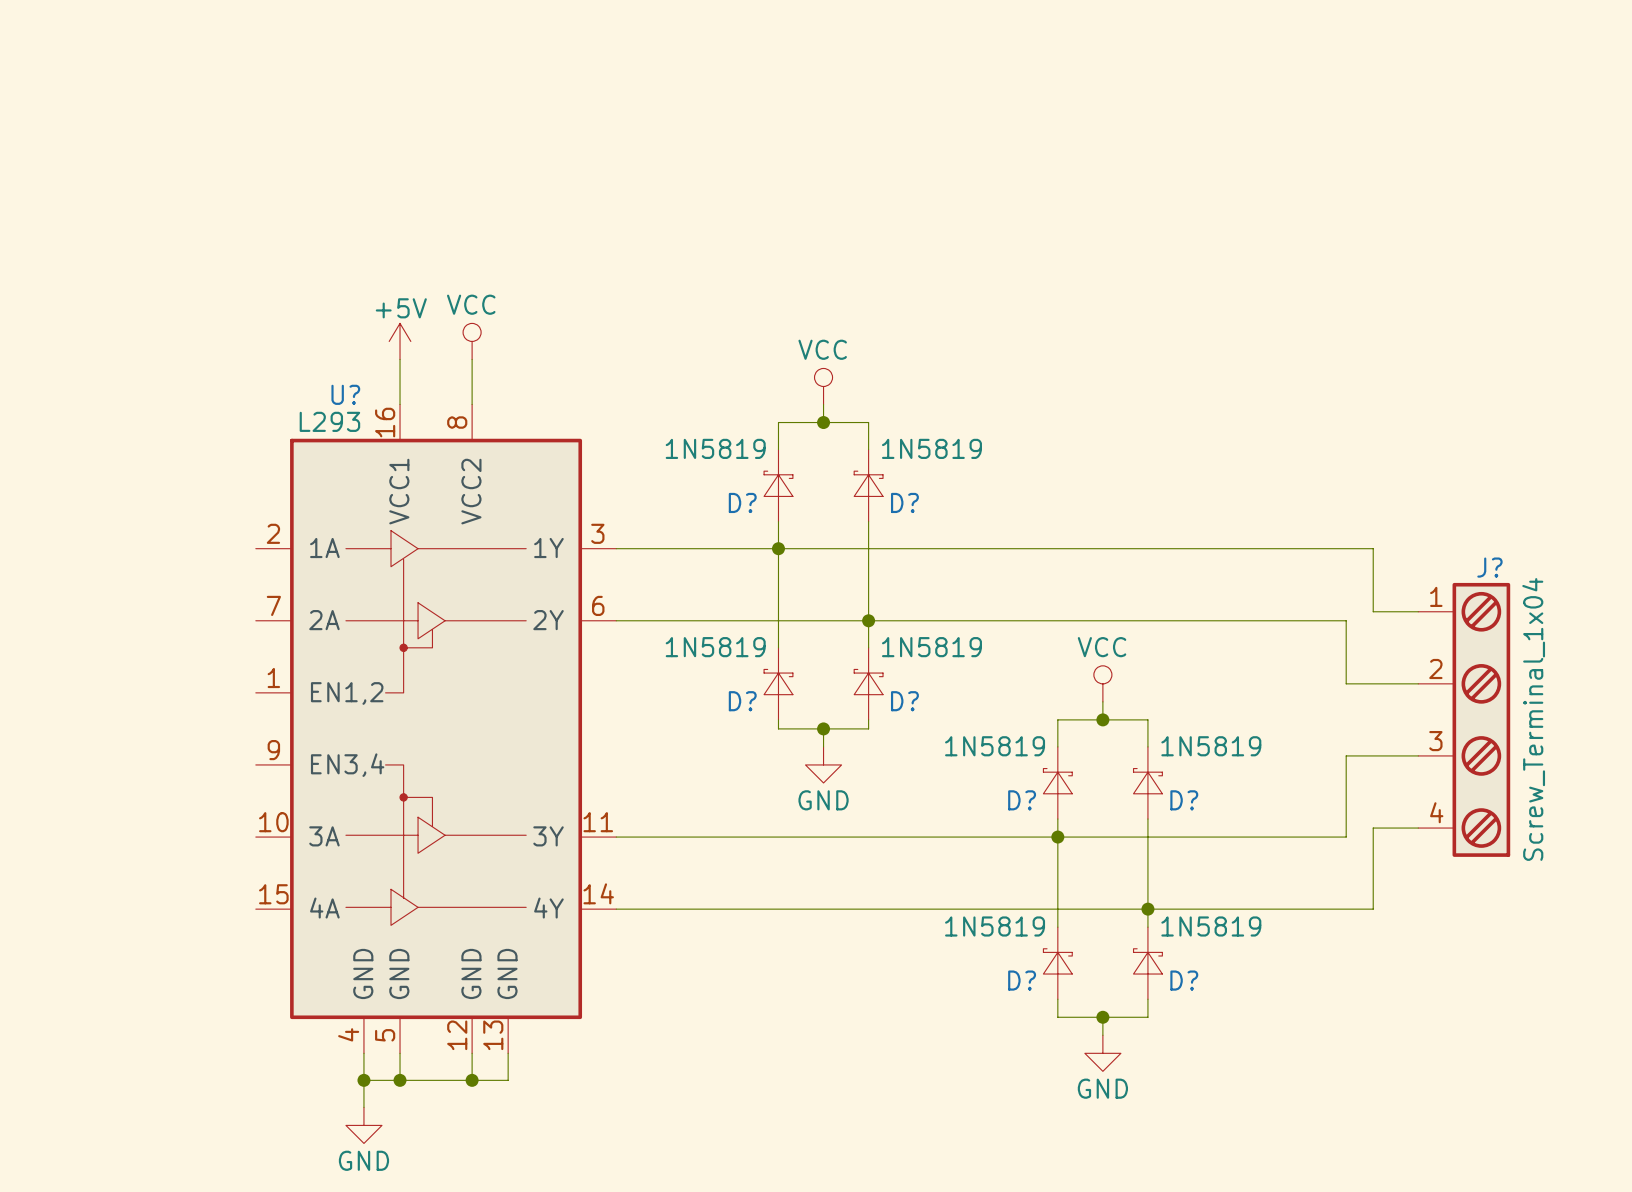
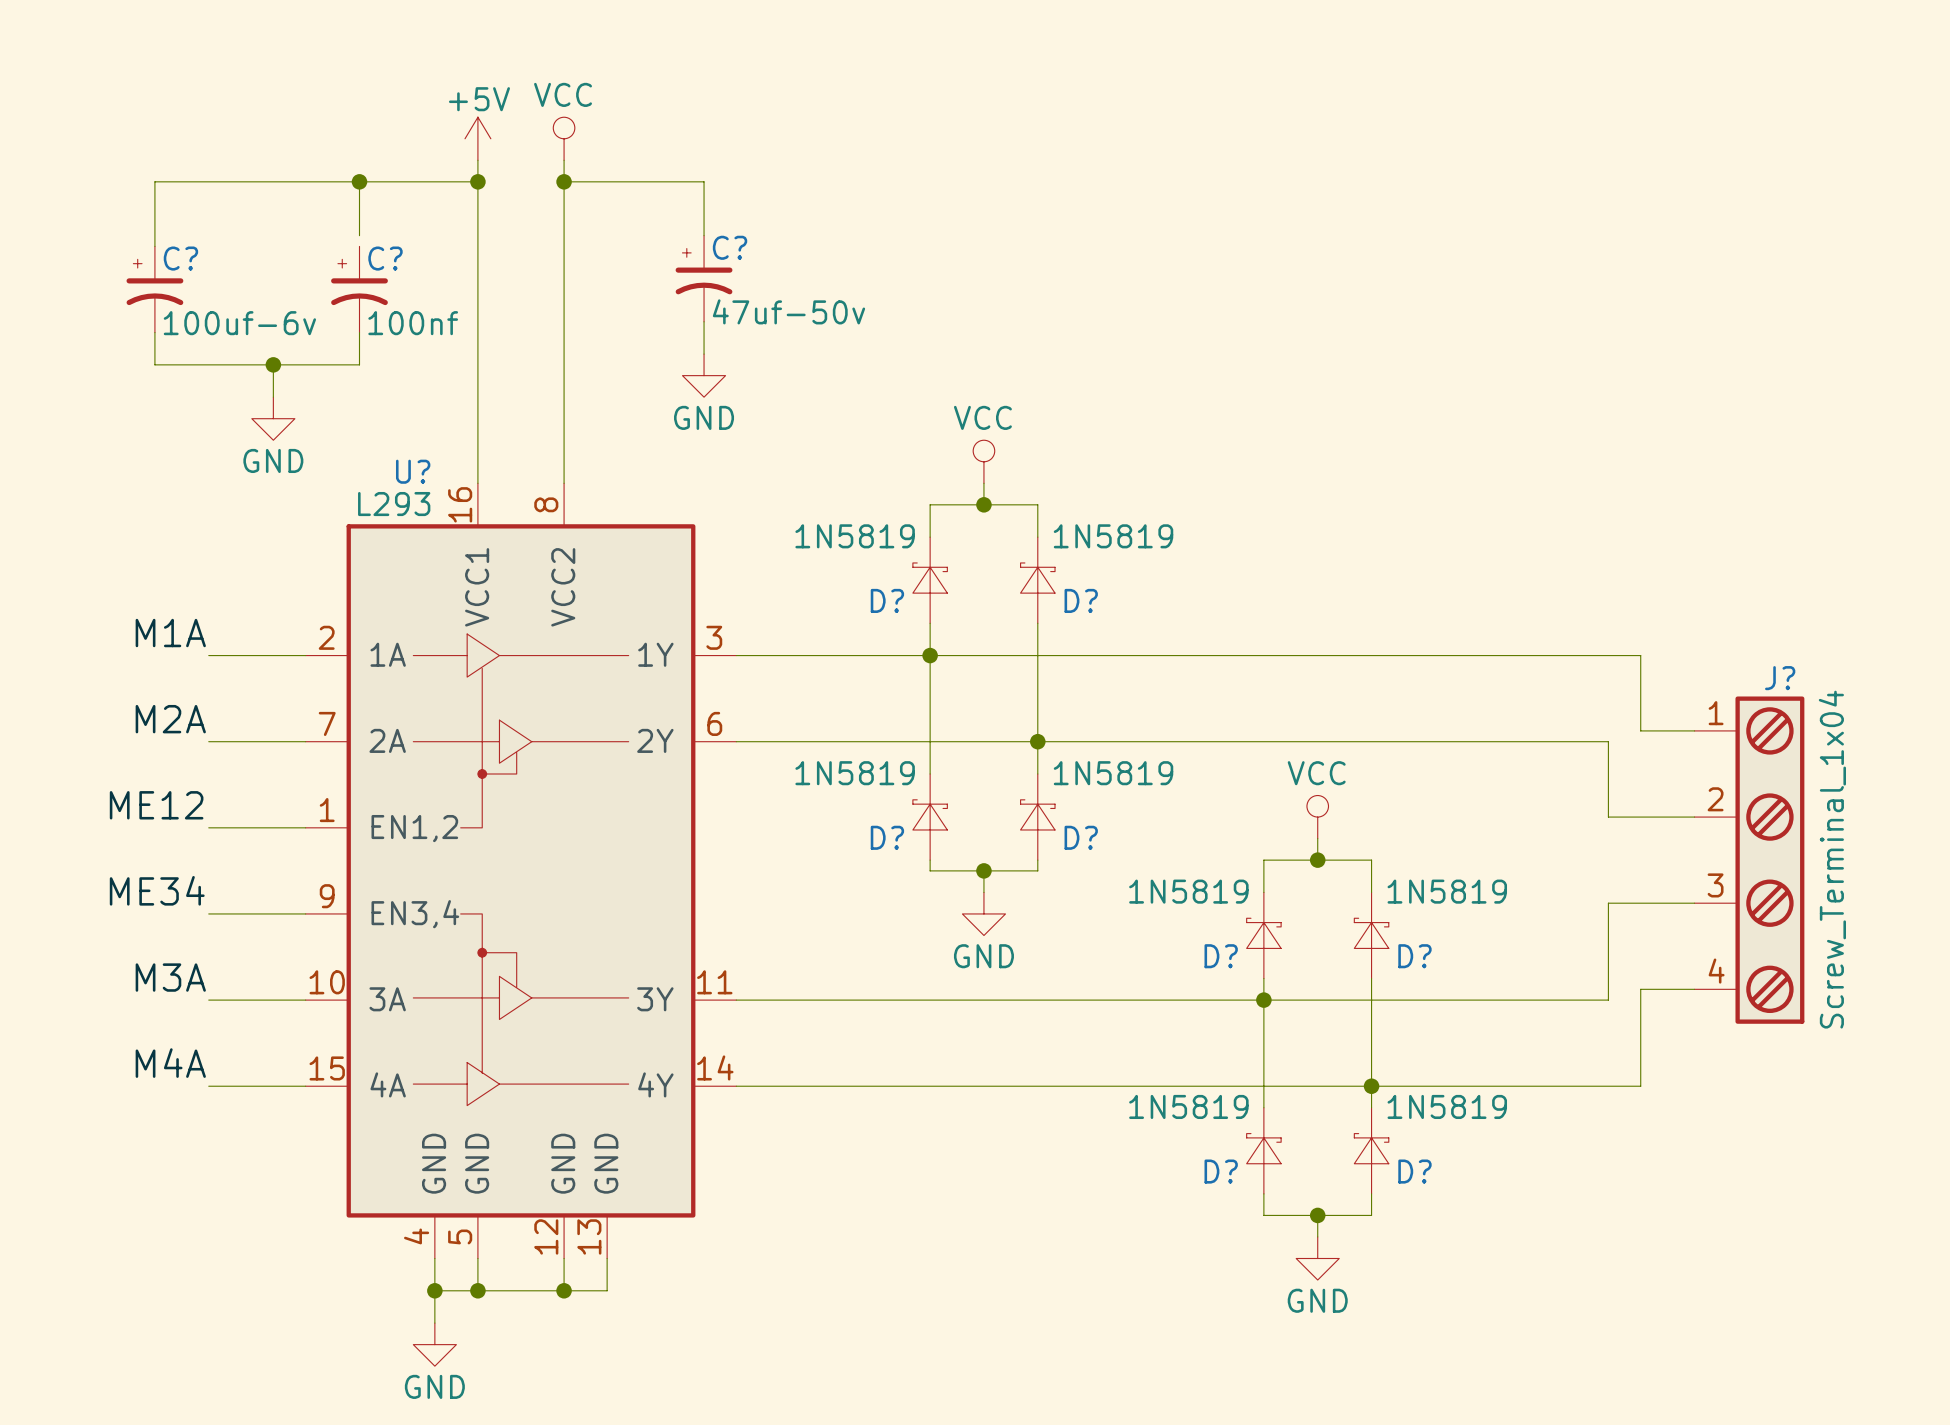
wire: none -> (477, 160) (477, 429)
wire: none -> (564, 160) (564, 429)
wire: none -> (359, 181) (359, 235)
junction: none -> (359, 181)
wire: none -> (477, 181) (154, 181) (154, 246)
junction: none -> (477, 181)
wire: none -> (564, 181) (704, 181) (704, 235)
junction: none -> (564, 181)
C?: none -> 47uf-50v (704, 278)
C?: none -> 100uf-6v (154, 289)
C?: none -> 100nf (359, 289)
wire: none -> (704, 321) (704, 354)
wire: none -> (154, 332) (154, 364) (359, 364) (359, 332)
wire: none -> (273, 364) (273, 397)
junction: none -> (273, 364)
power symbol: none -> GND (704, 375)
power symbol position: +5V (400, 341) -> +5V (477, 138)
power symbol position: VCC (472, 341) -> VCC (564, 138)
power symbol: none -> GND (273, 418)
label: none -> M1A (170, 633)
wire: none -> (208, 655) (305, 655)
label: none -> M2A (170, 719)
wire: none -> (208, 741) (305, 741)
label: none -> ME12 (156, 805)
wire: none -> (208, 827) (305, 827)
label: none -> ME34 (157, 890)
wire: none -> (208, 913) (305, 913)
label: none -> M3A (170, 977)
wire: none -> (208, 1000) (305, 1000)
label: none -> M4A (170, 1063)
wire: none -> (208, 1086) (305, 1086)

